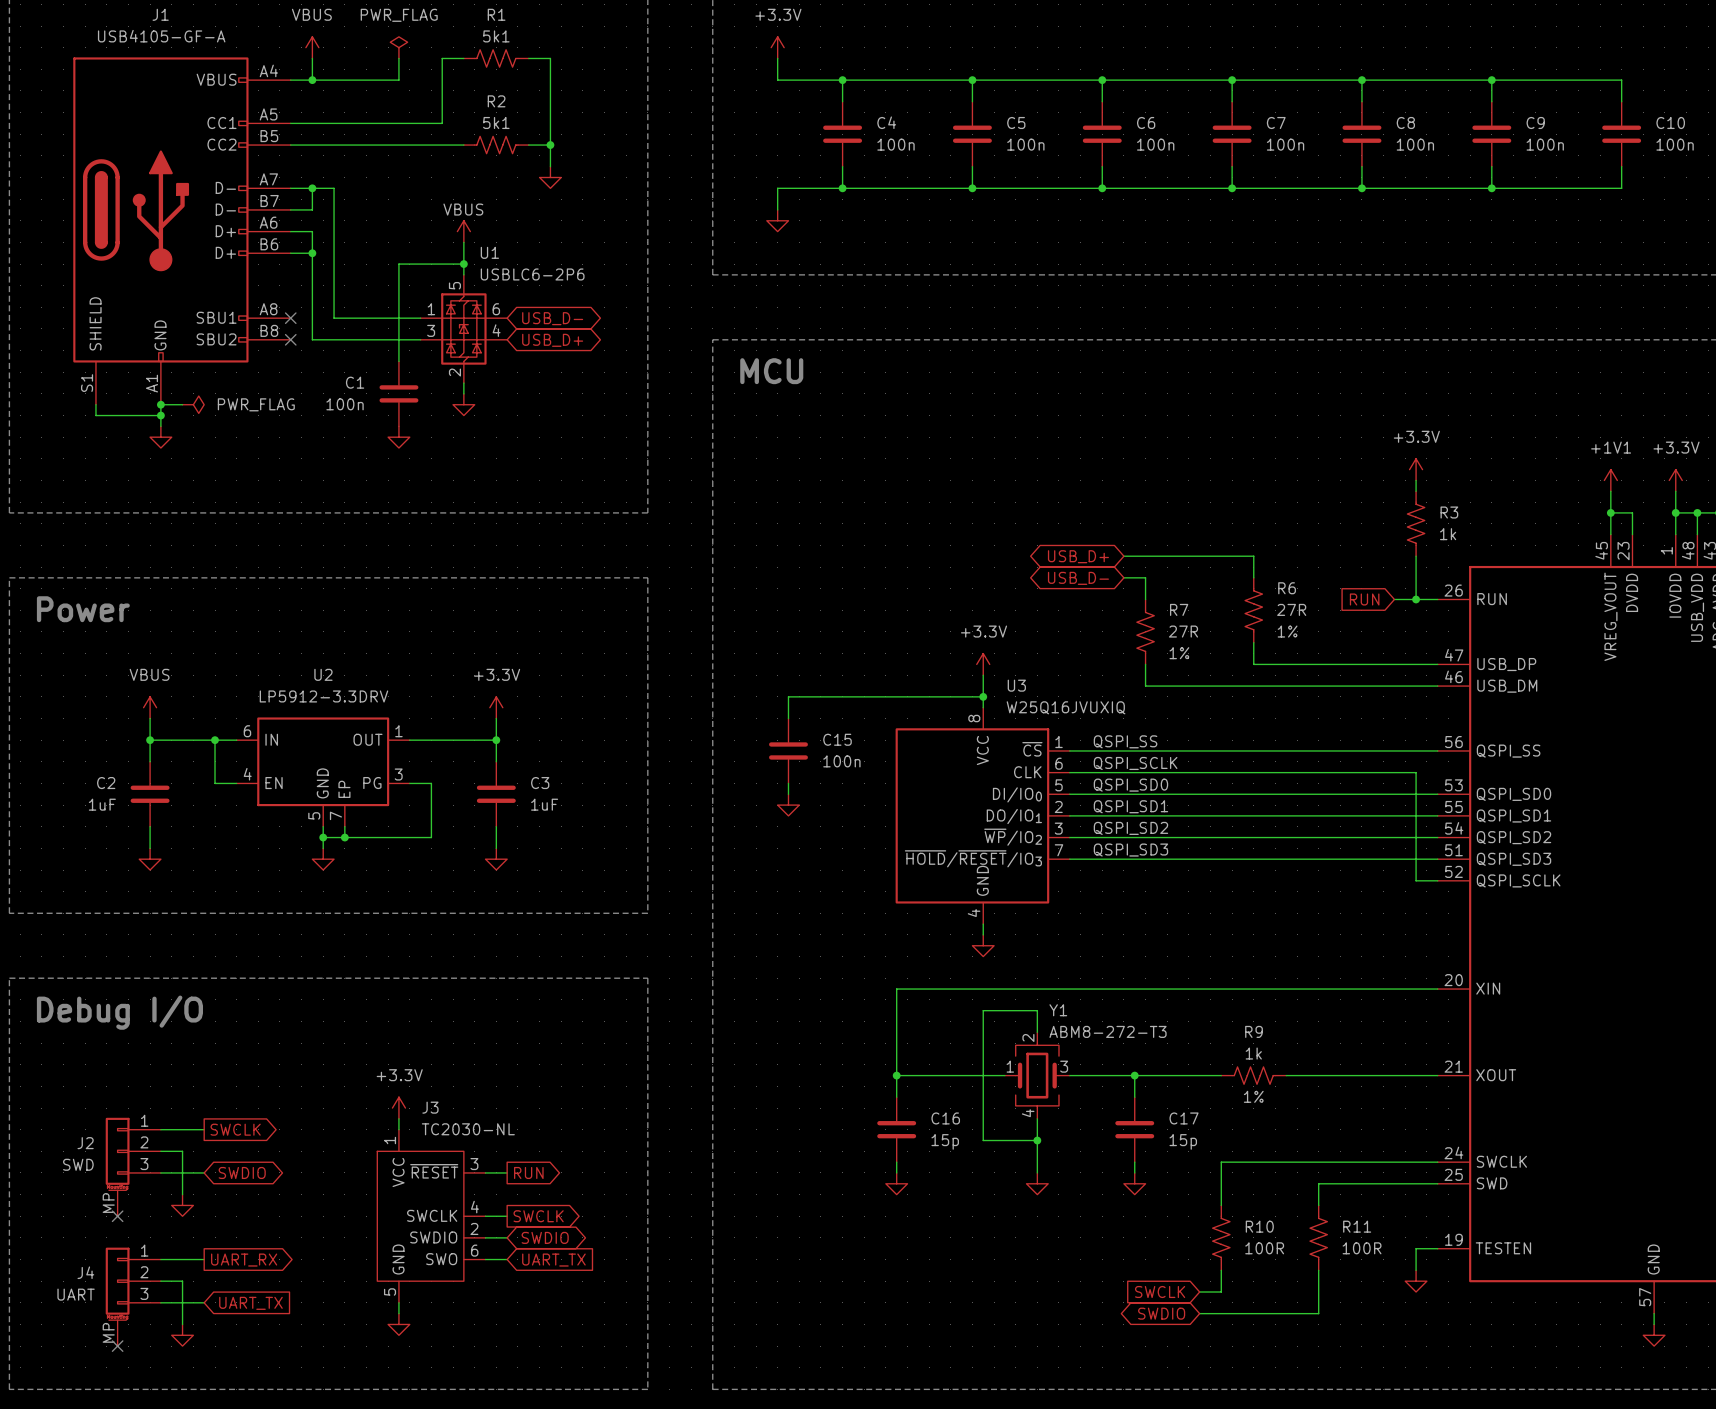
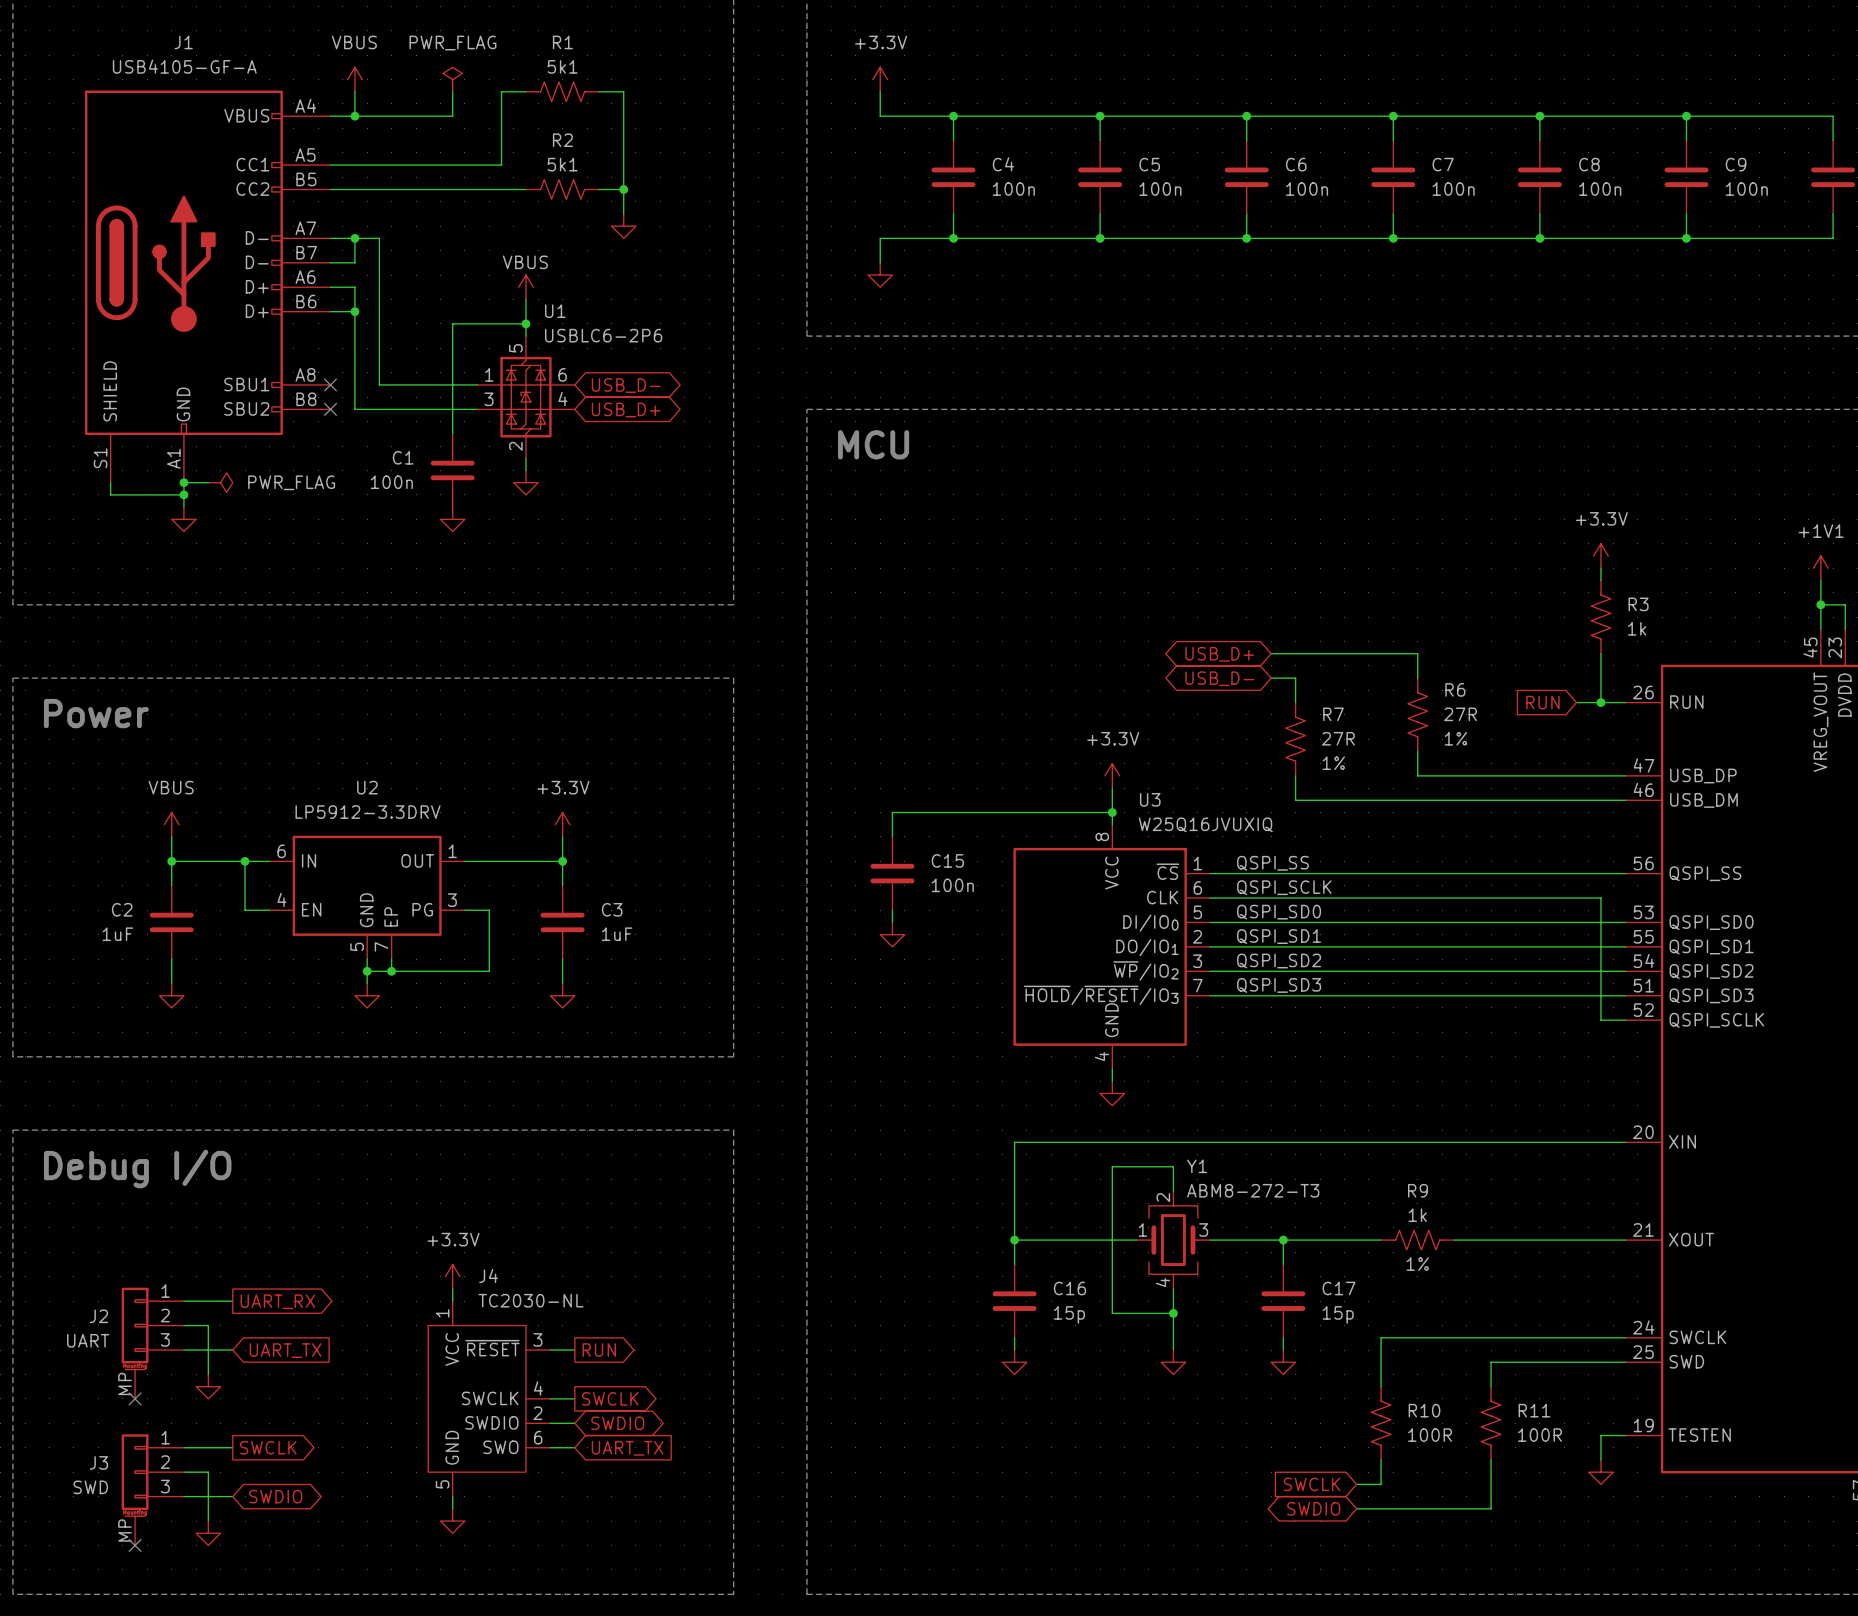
J3 name: J3 (430, 1107) -> J4 (488, 1275)
global label: SWCLK (235, 1129) -> UART_RX (277, 1301)
J2 value: SWD (78, 1164) -> UART (88, 1340)
global label shape: bidirectional (242, 1172) -> input (285, 1350)
global label: SWDIO (242, 1172) -> UART_TX (285, 1350)
global label: UART_RX (244, 1260) -> SWCLK (268, 1447)
J4 name: J4 (85, 1272) -> J3 (98, 1462)
J4 value: UART (76, 1294) -> SWD (90, 1487)
global label shape: input (250, 1303) -> bidirectional (275, 1496)
global label: UART_TX (250, 1303) -> SWDIO (275, 1496)

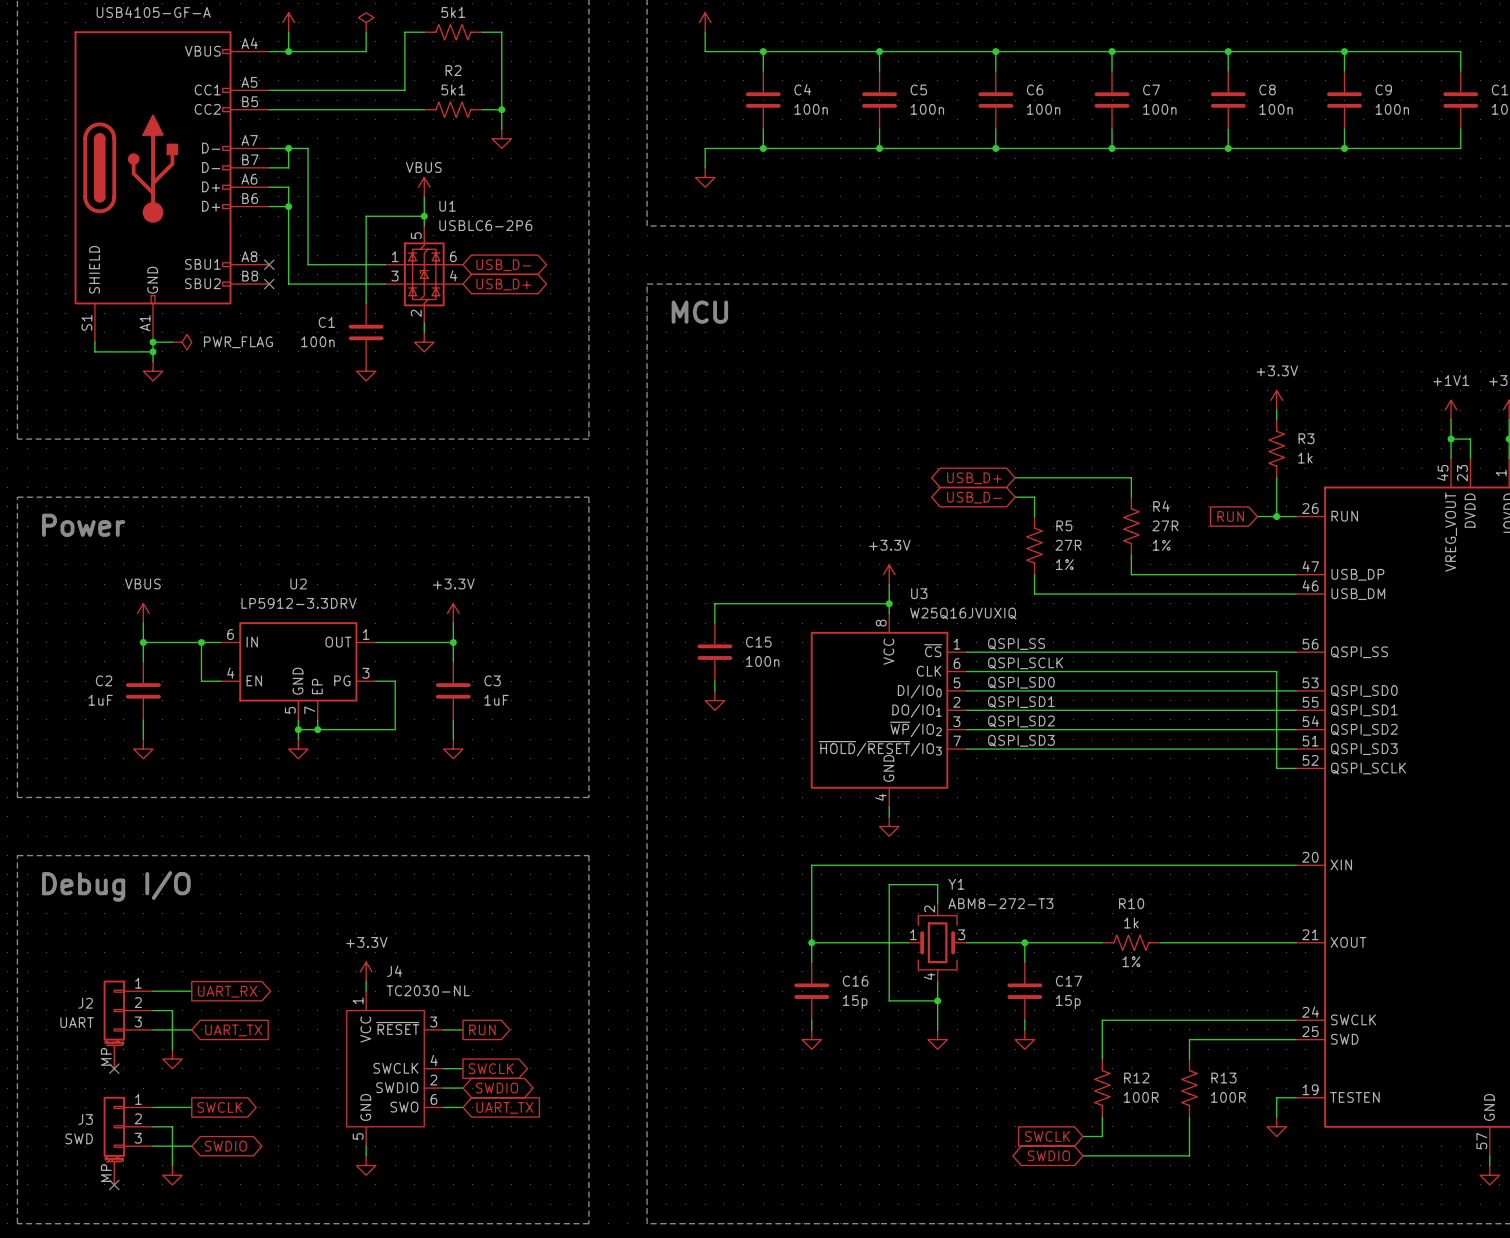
R6 name: R6 (1455, 689) -> R4 (1161, 506)
R7 name: R7 (1333, 714) -> R5 (1064, 525)
R9 name: R9 (1418, 1190) -> R10 (1131, 903)
R10 name: R10 (1424, 1410) -> R12 (1136, 1078)
R11 name: R11 (1534, 1410) -> R13 (1223, 1078)

